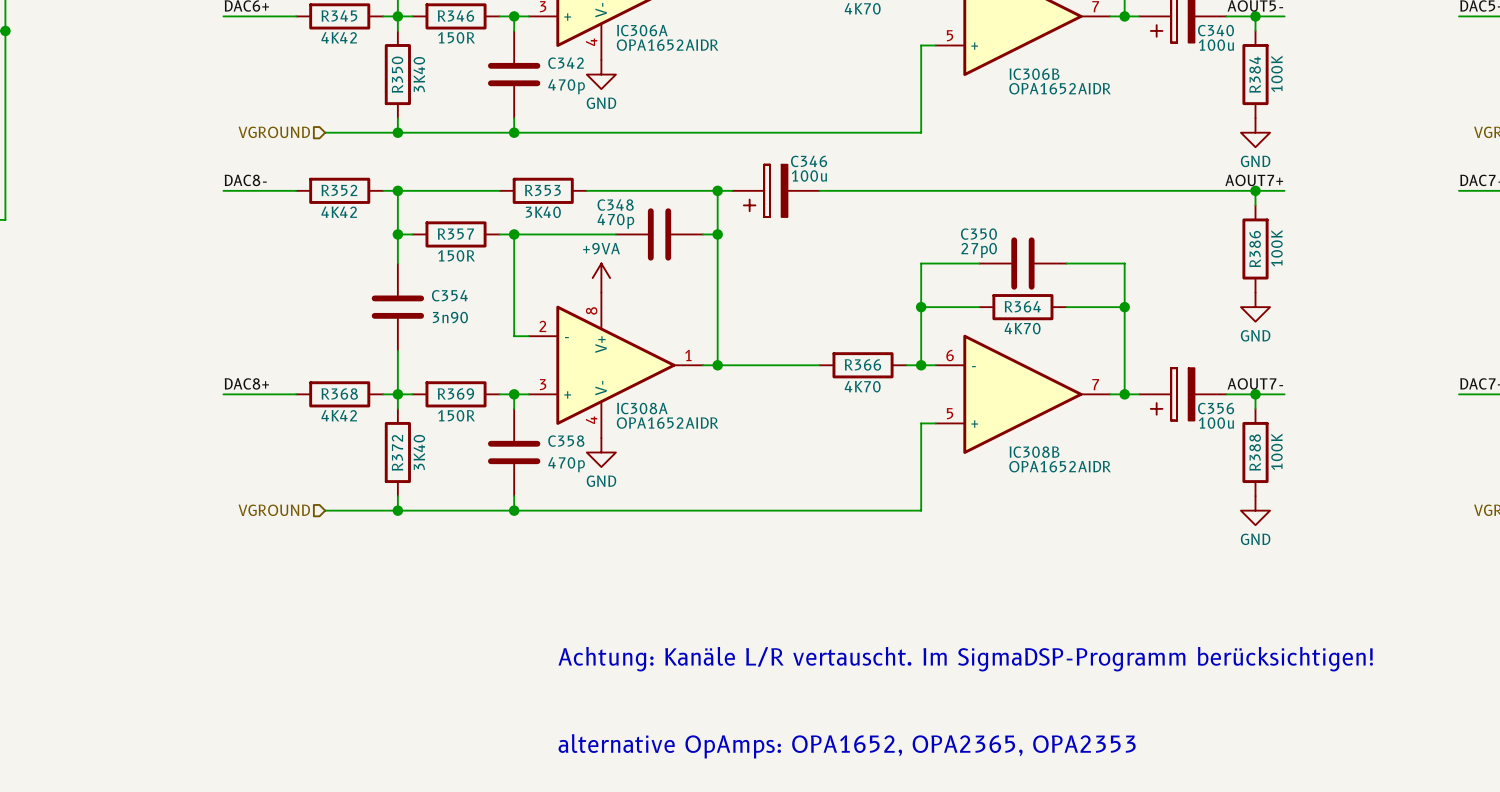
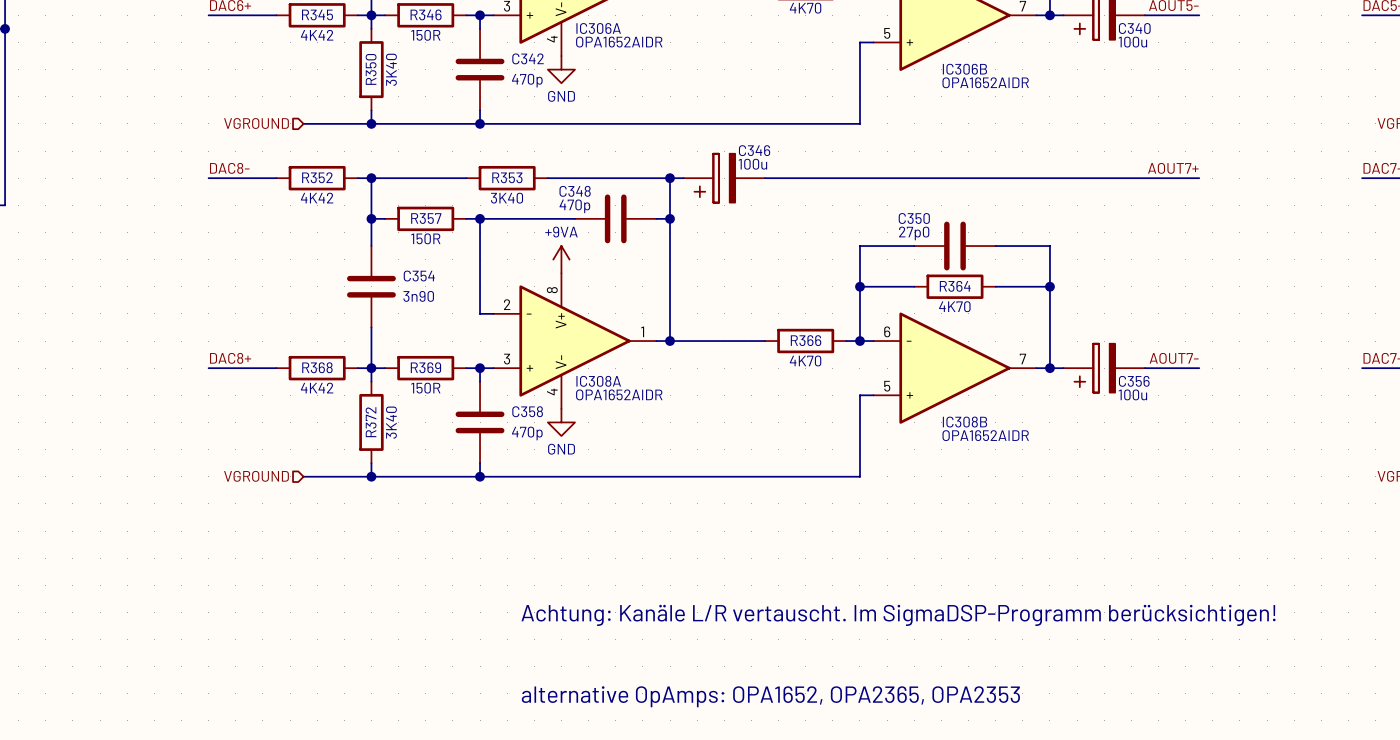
wire: (1255, 16) (1255, 30) -> none
junction: (1255, 16) -> none
R384: (1255, 74) -> none
power symbol: GND (1255, 132) -> none
wire: (1255, 190) (1255, 205) -> none
junction: (1255, 190) -> none
R386: (1255, 248) -> none
power symbol: GND (1255, 307) -> none
wire: (1255, 394) (1255, 408) -> none
junction: (1255, 394) -> none
R388: (1255, 452) -> none
power symbol: GND (1255, 510) -> none

